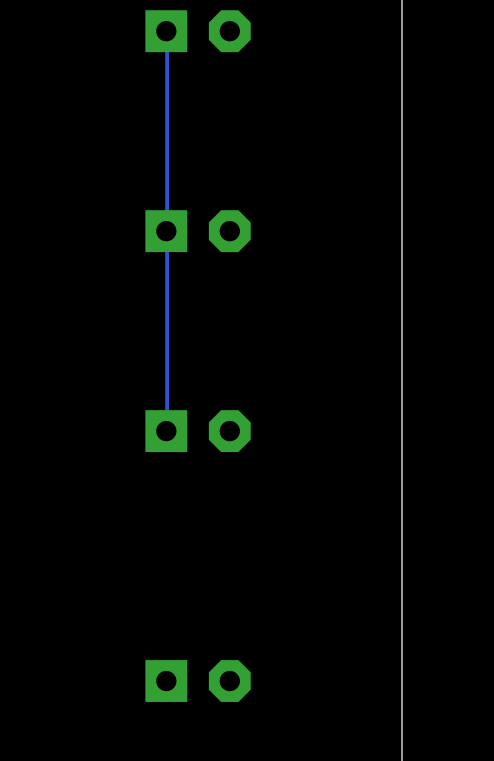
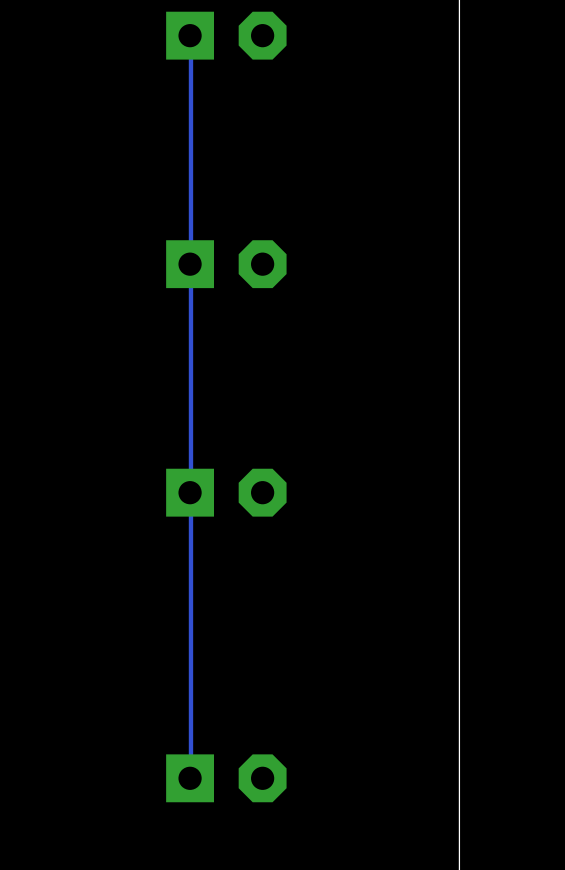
track: none -> (190, 492) (190, 778)

